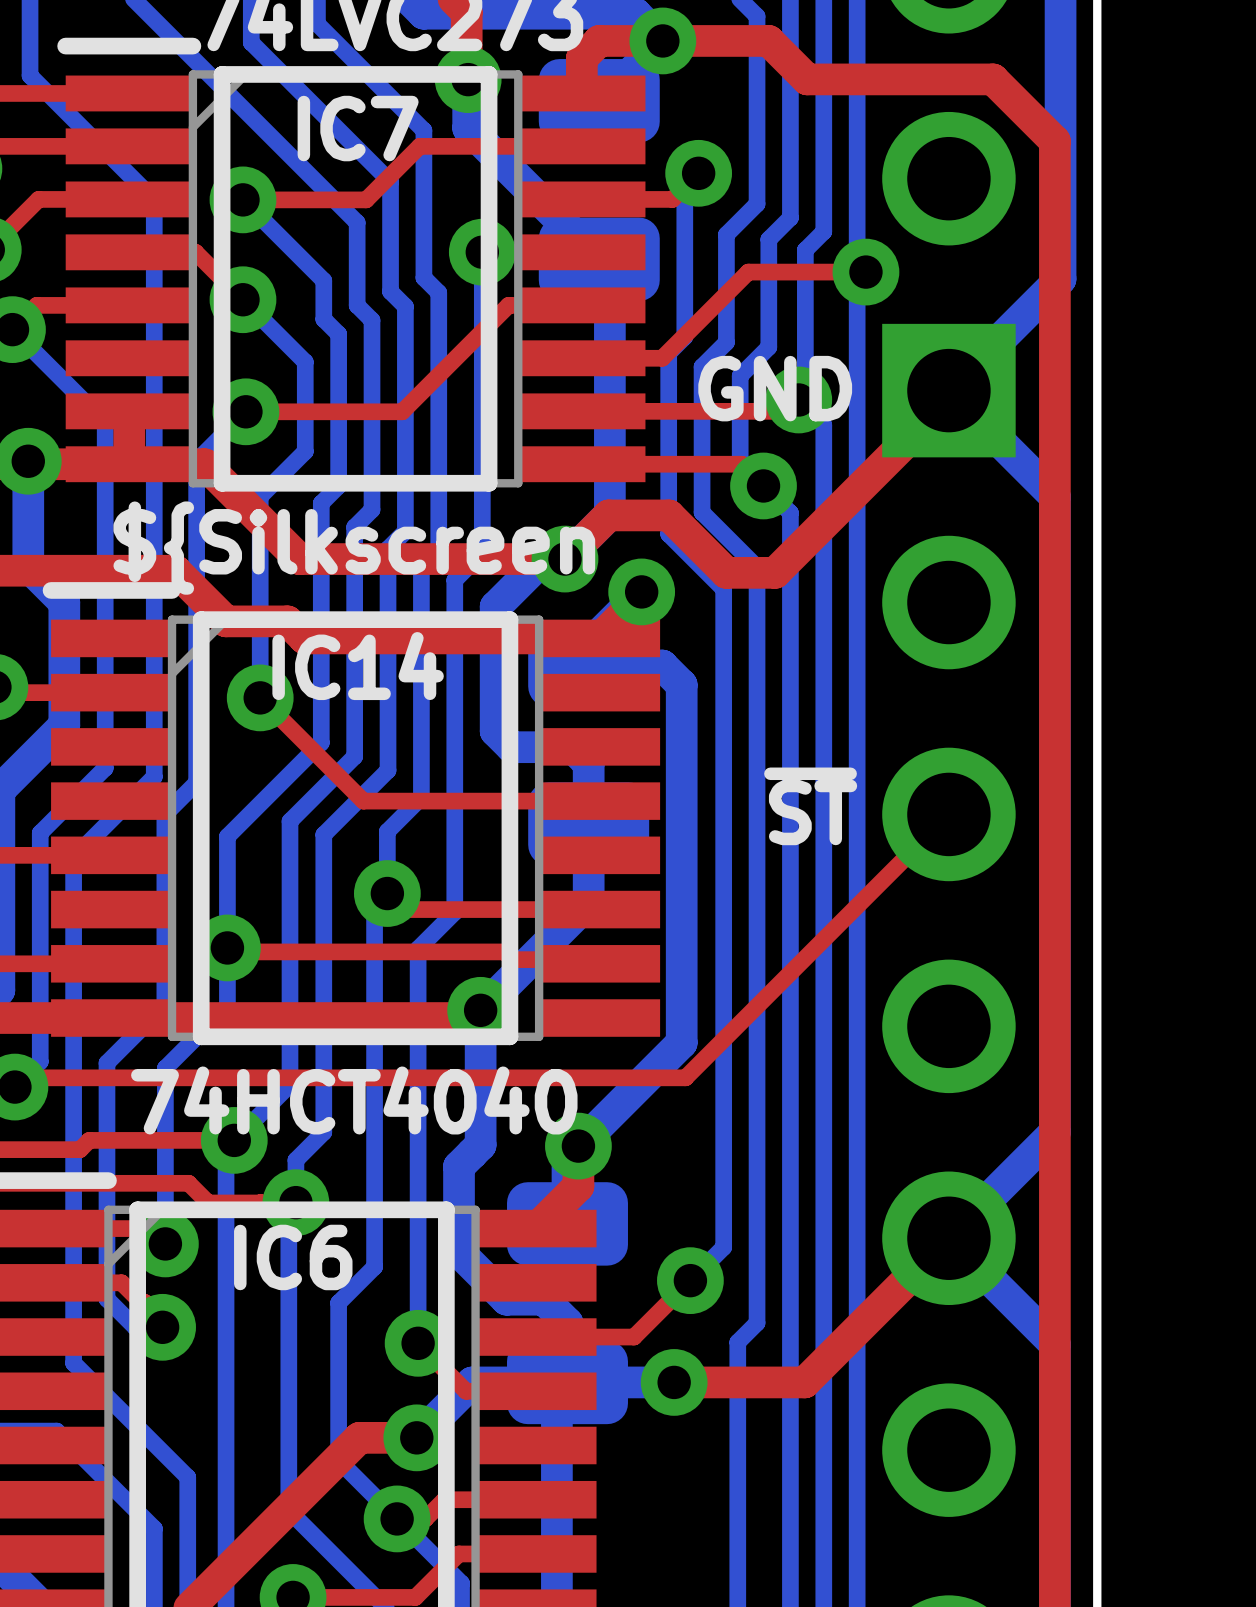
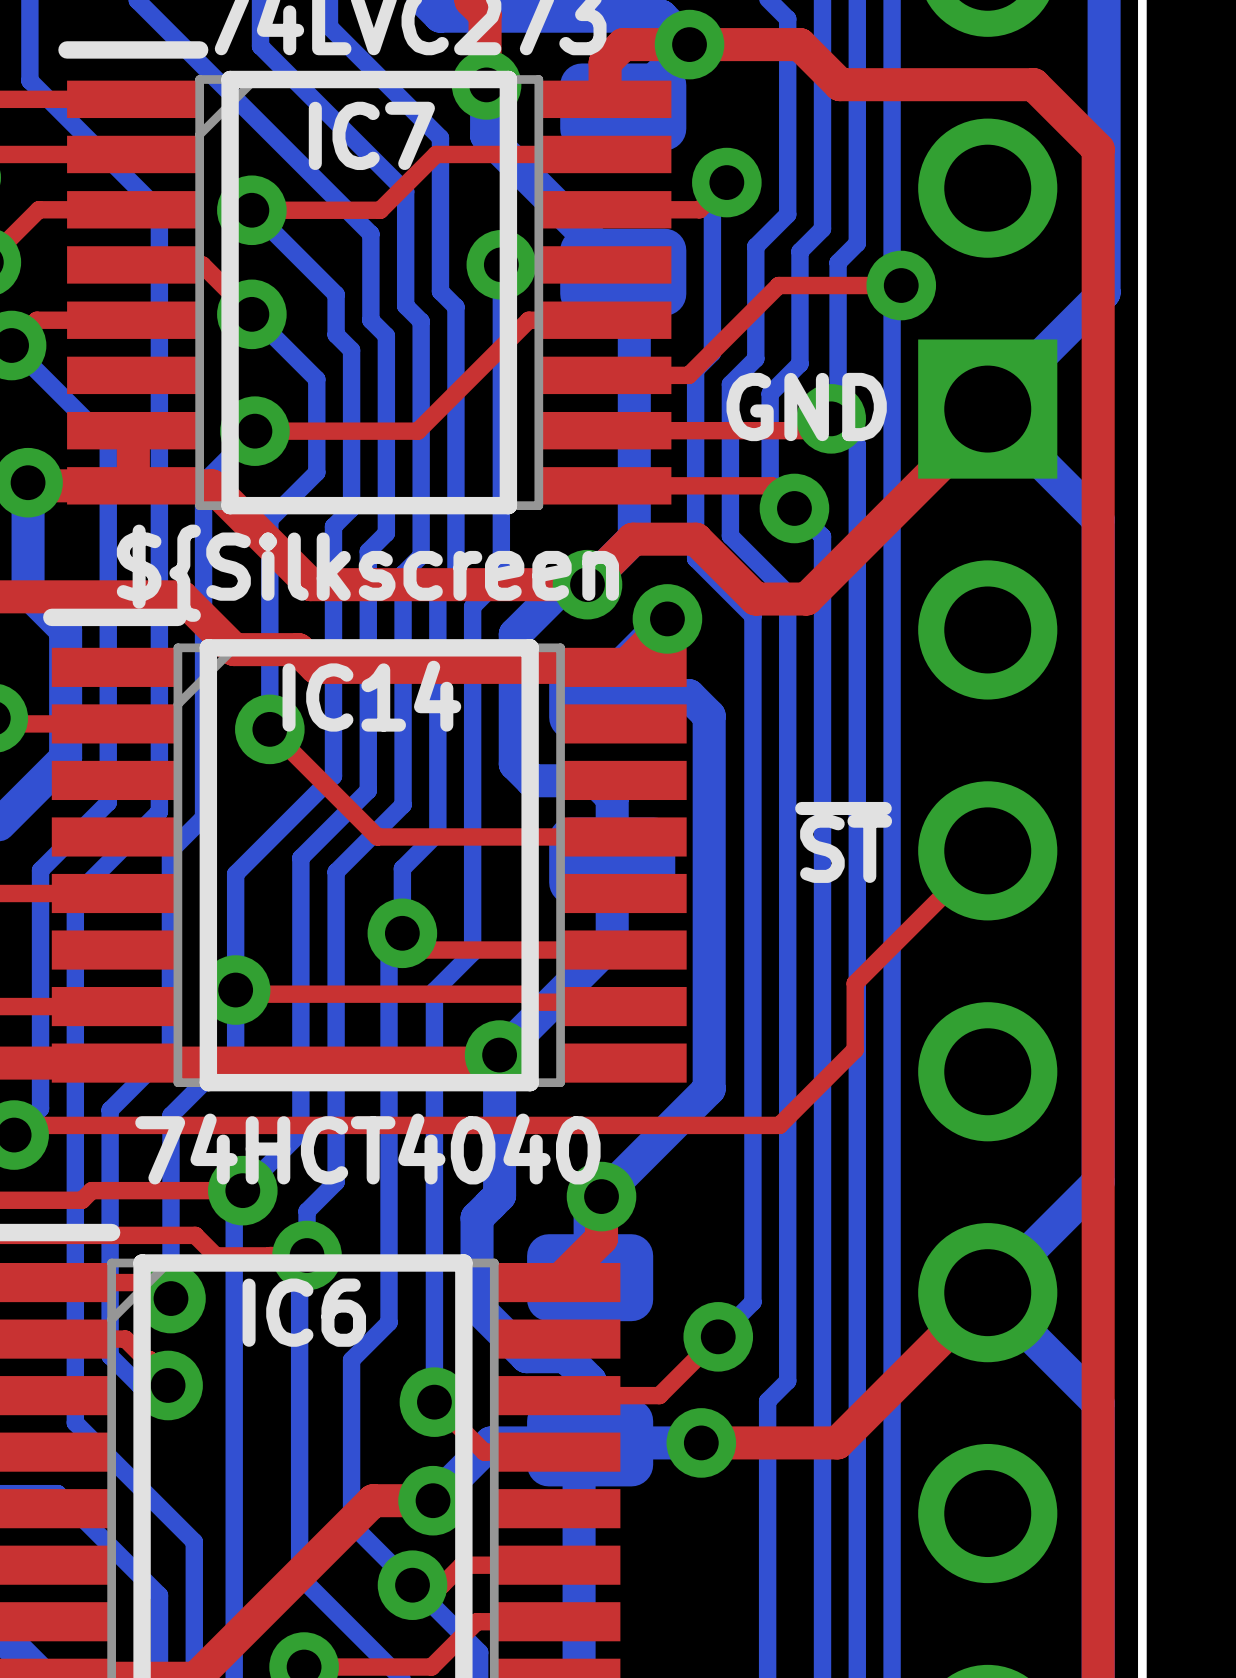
top track: (821, 941) (685, 1077) -> (855, 983) (855, 1049) (779, 1125) (713, 1125)

